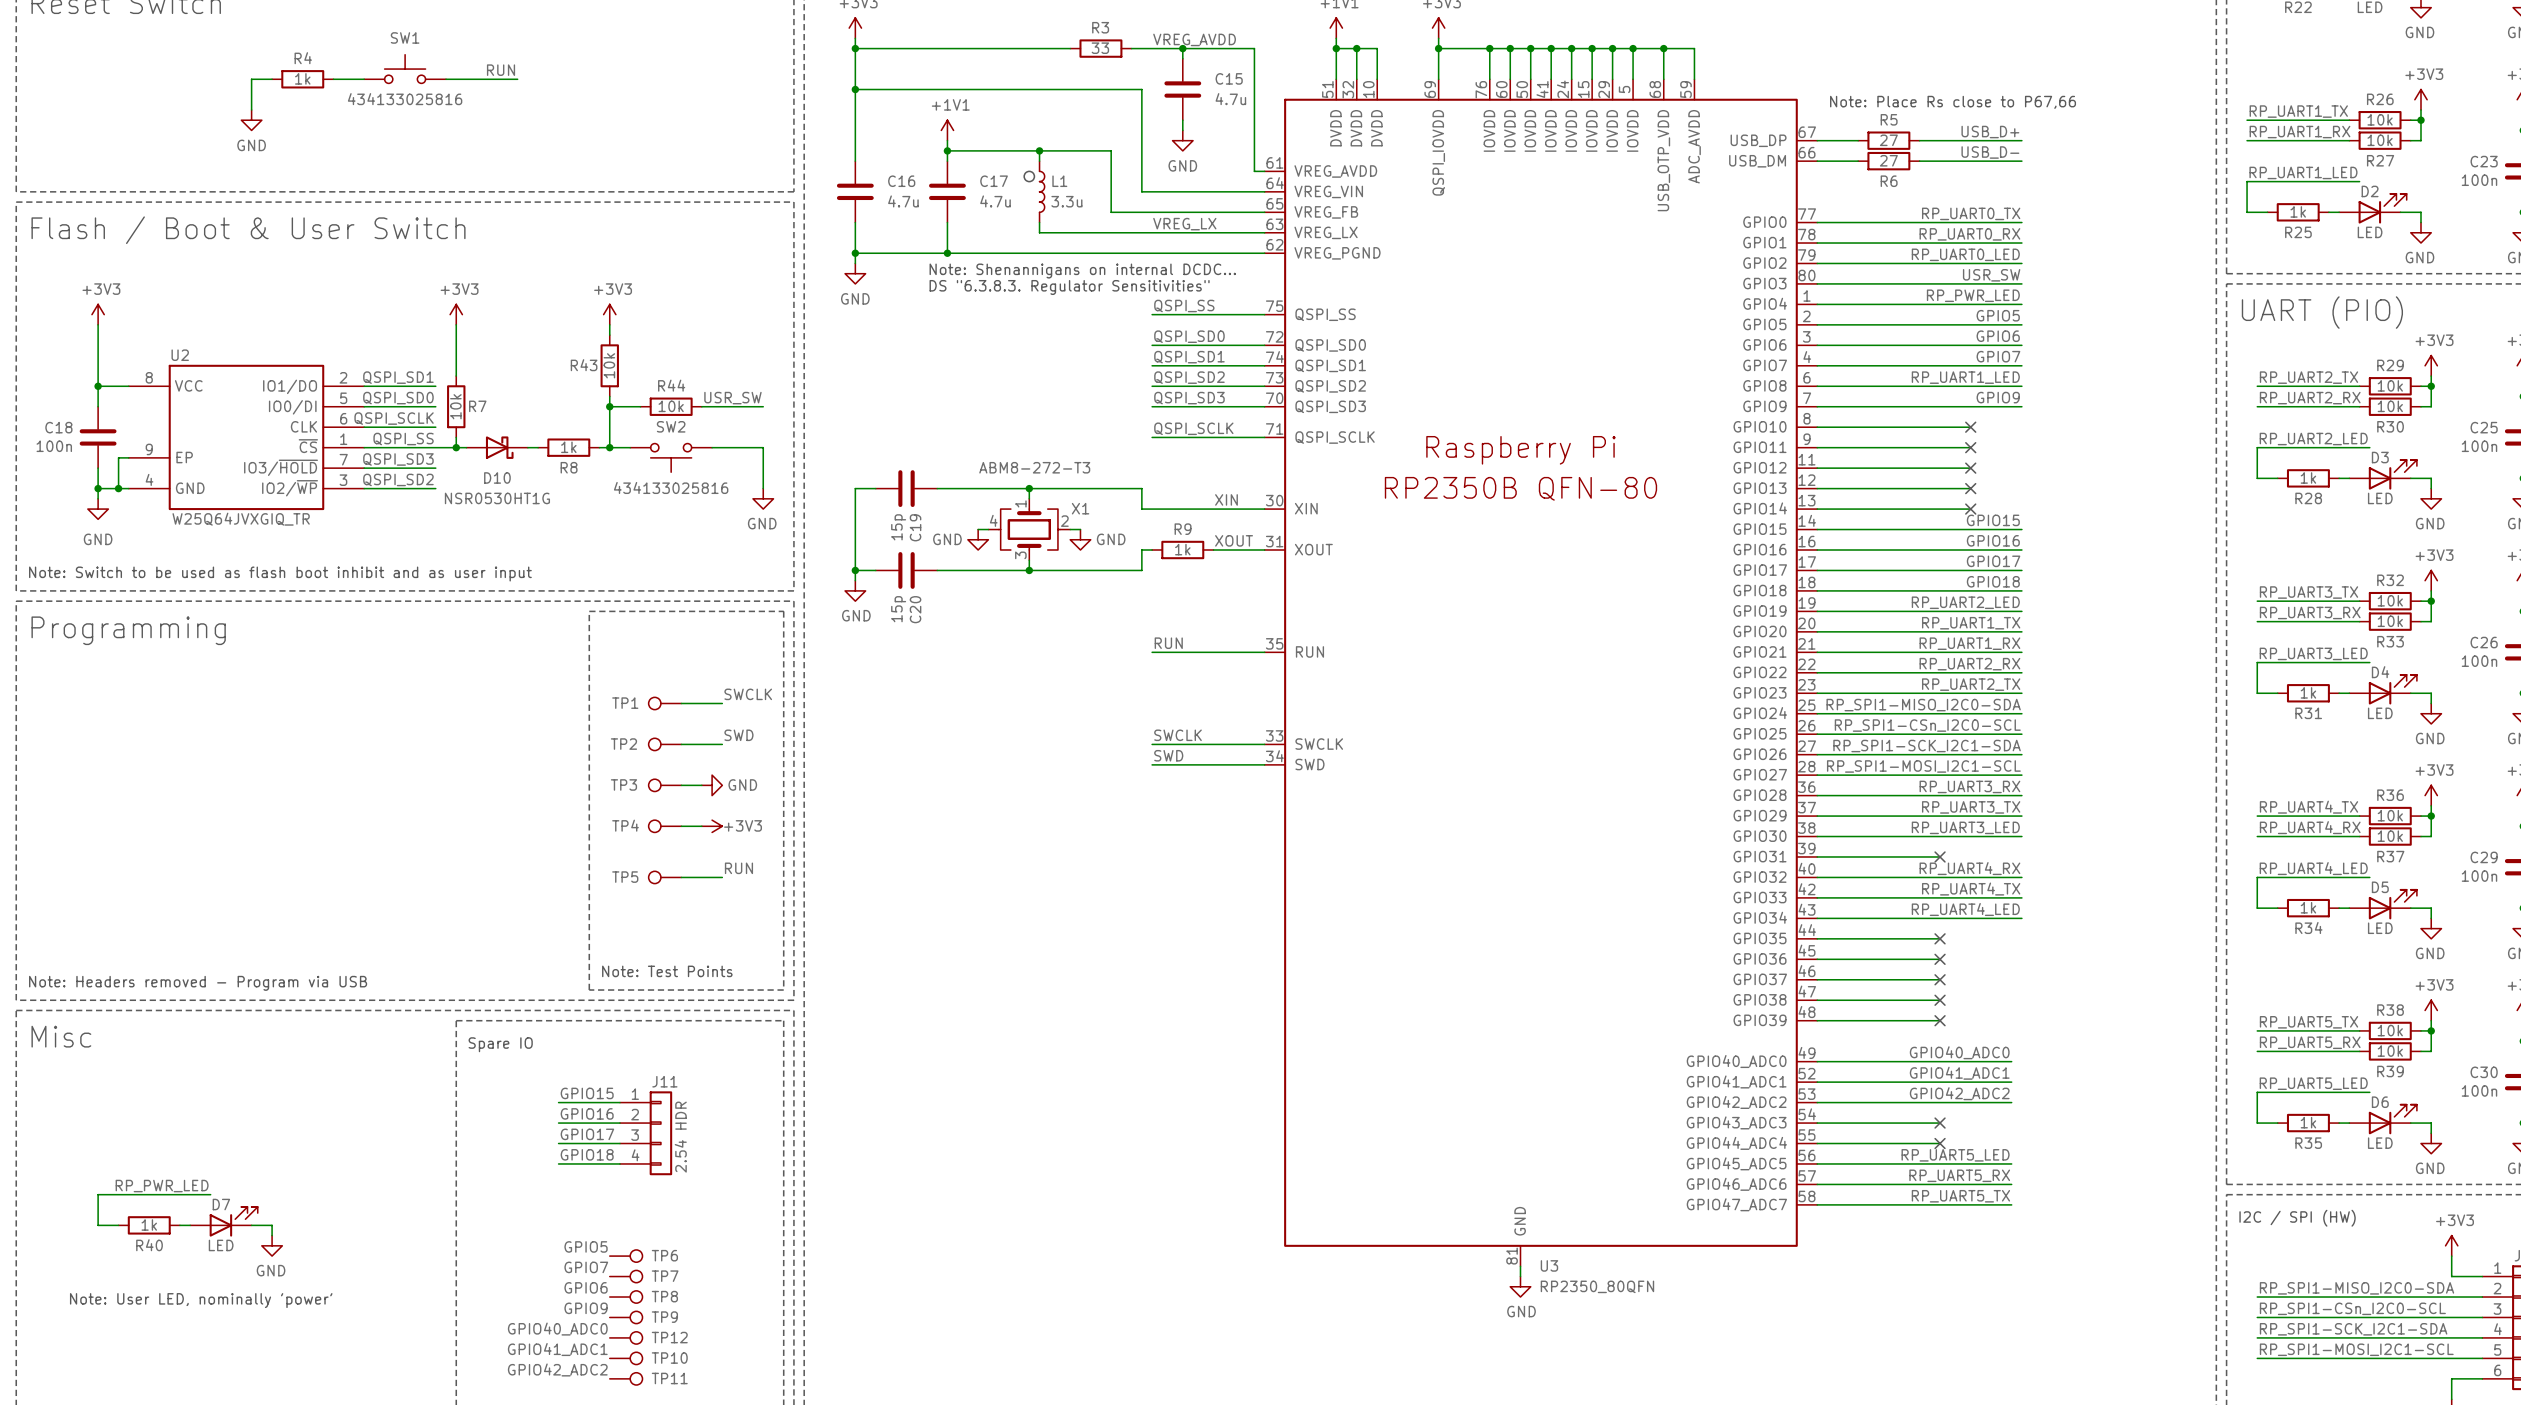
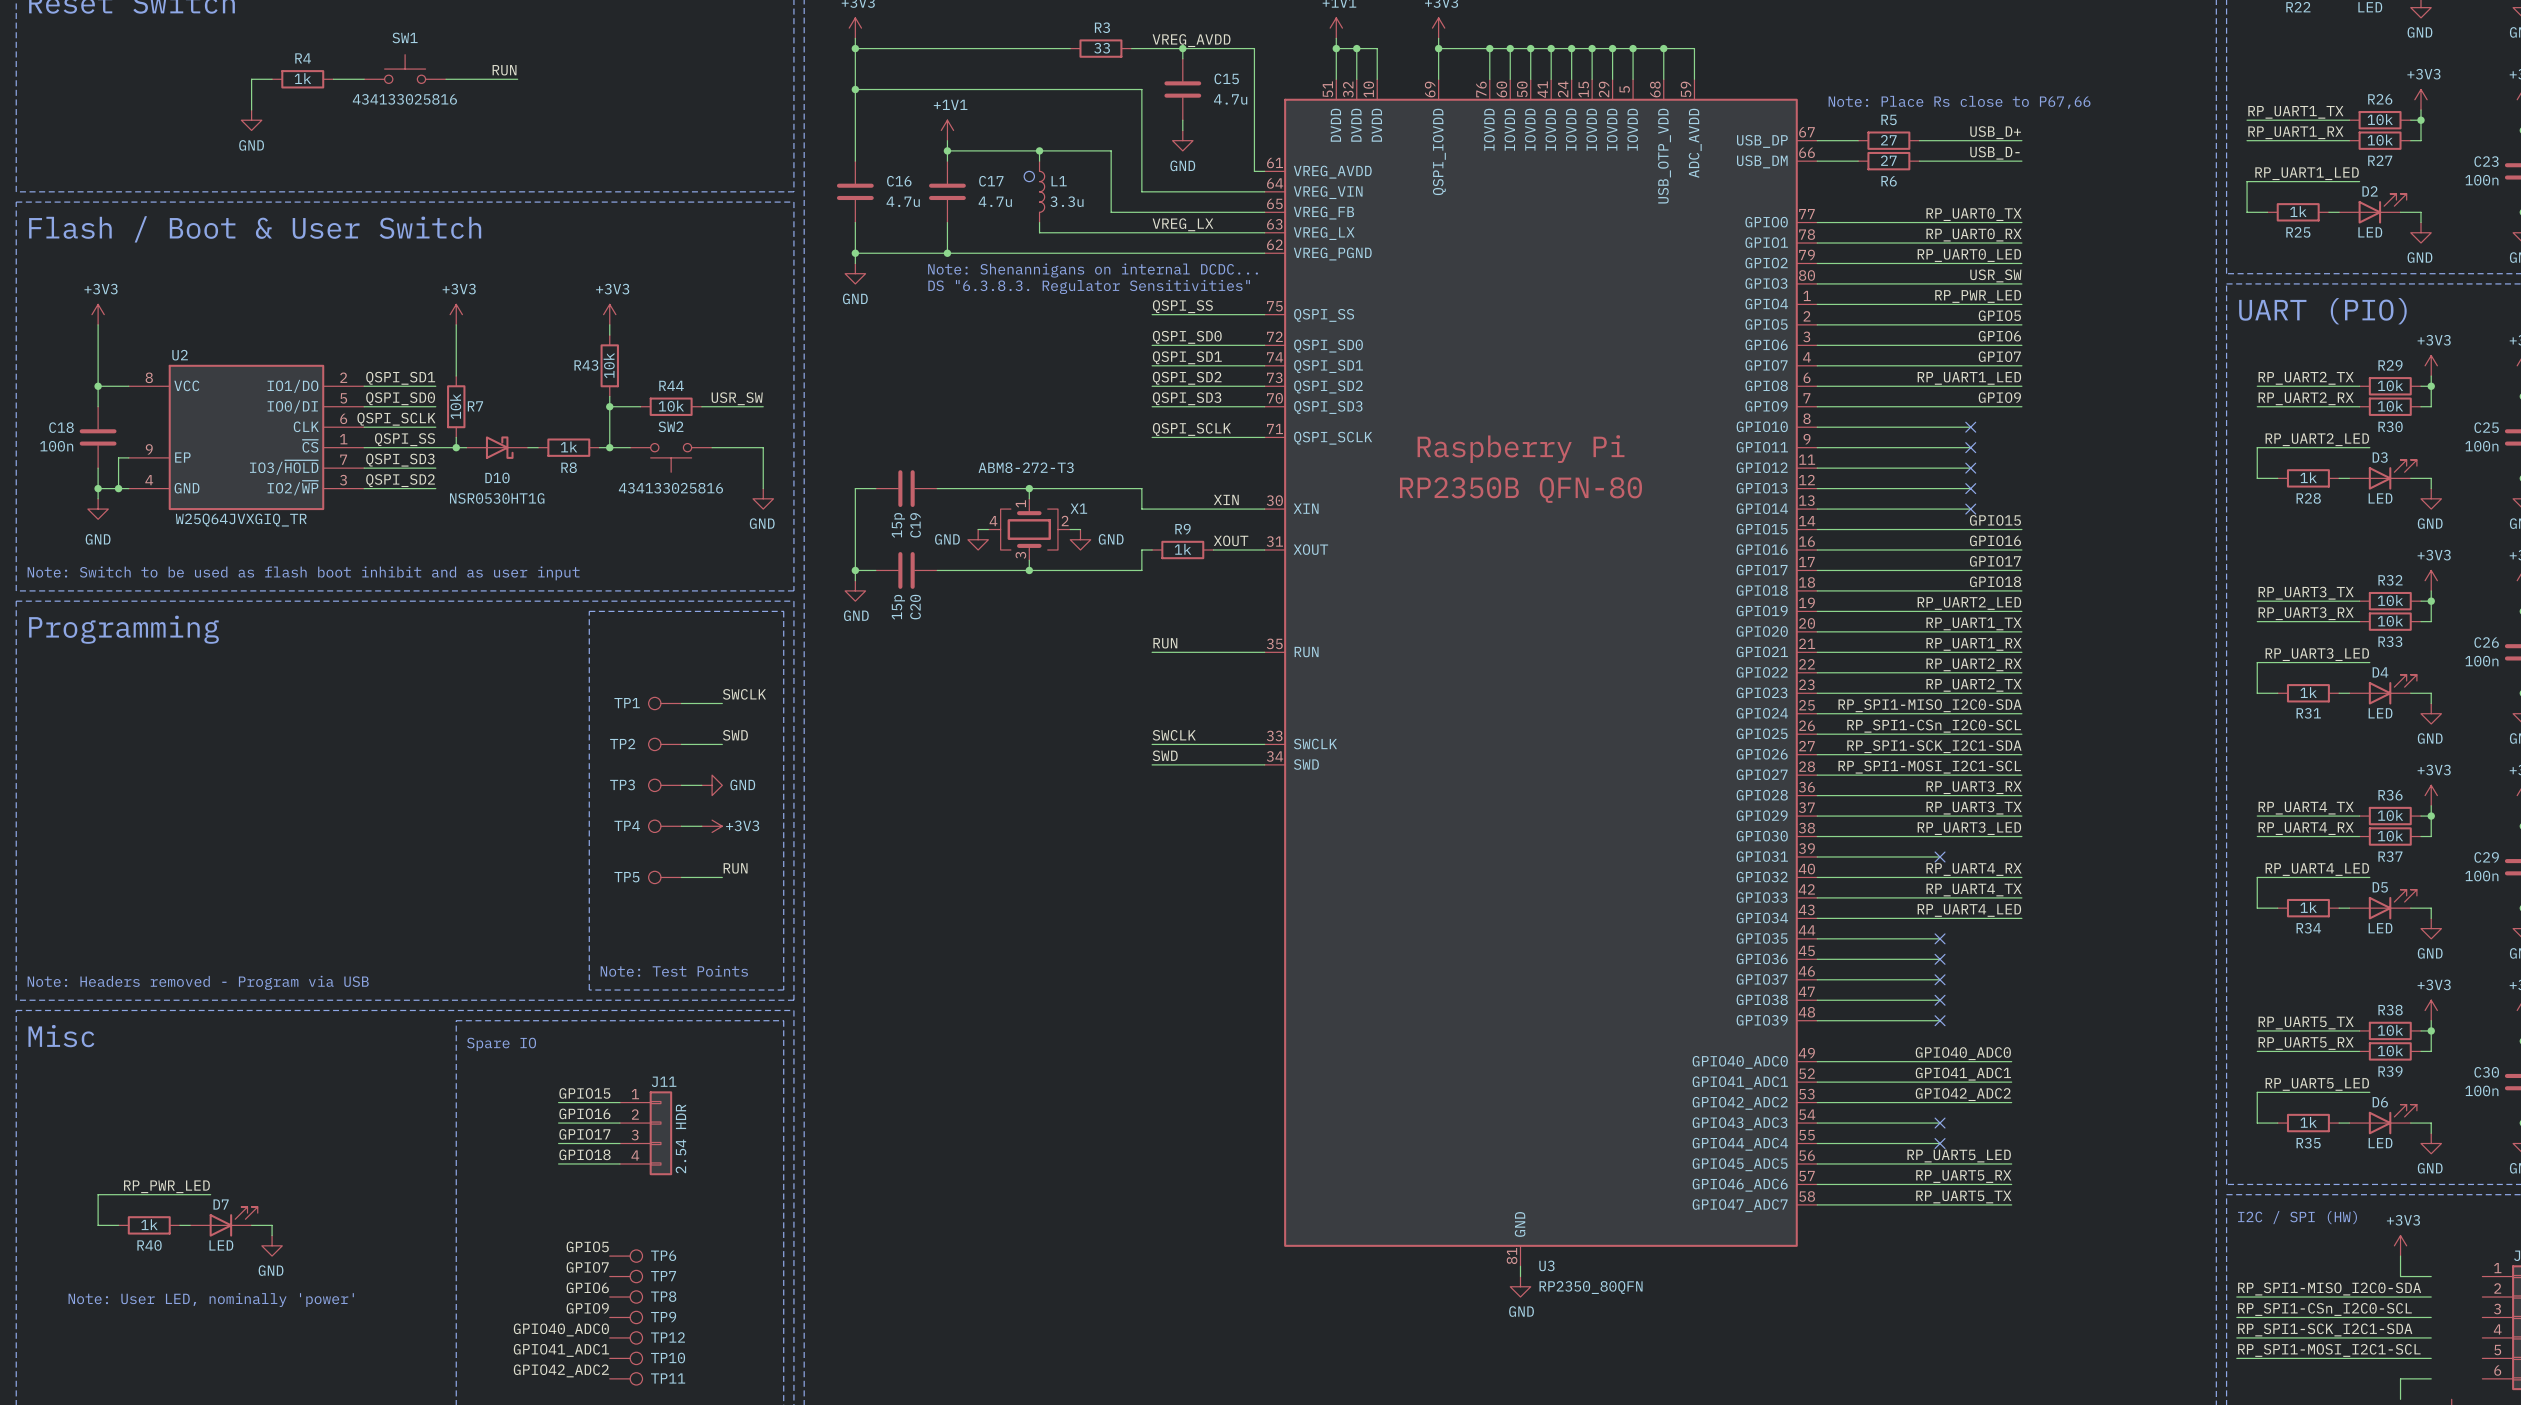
power symbol position: +3V3 (2451, 1245) -> +3V3 (2400, 1245)
wire: (2451, 1256) (2451, 1276) (2482, 1276) -> (2400, 1256) (2400, 1276) (2431, 1276)
label position: RP_SPI1-MISO_I2C0-SDA (2356, 1288) -> RP_SPI1-MISO_I2C0-SDA (2329, 1289)
wire: none -> (2236, 1297) (2257, 1297)
wire: (2431, 1297) (2482, 1297) -> none
label position: RP_SPI1-CSn_I2C0-SCL (2352, 1308) -> RP_SPI1-CSn_I2C0-SCL (2324, 1309)
wire: none -> (2236, 1317) (2257, 1317)
wire: (2431, 1317) (2482, 1317) -> none
label position: RP_SPI1-SCK_I2C1-SDA (2353, 1329) -> RP_SPI1-SCK_I2C1-SDA (2325, 1329)
wire: none -> (2236, 1337) (2257, 1337)
wire: (2431, 1337) (2482, 1337) -> none
label position: RP_SPI1-MOSI_I2C1-SCL (2356, 1349) -> RP_SPI1-MOSI_I2C1-SCL (2329, 1350)
wire: none -> (2236, 1358) (2257, 1358)
wire: (2431, 1358) (2482, 1358) -> none
wire: (2482, 1378) (2451, 1378) (2451, 1399) -> (2431, 1378) (2400, 1378) (2400, 1399)

